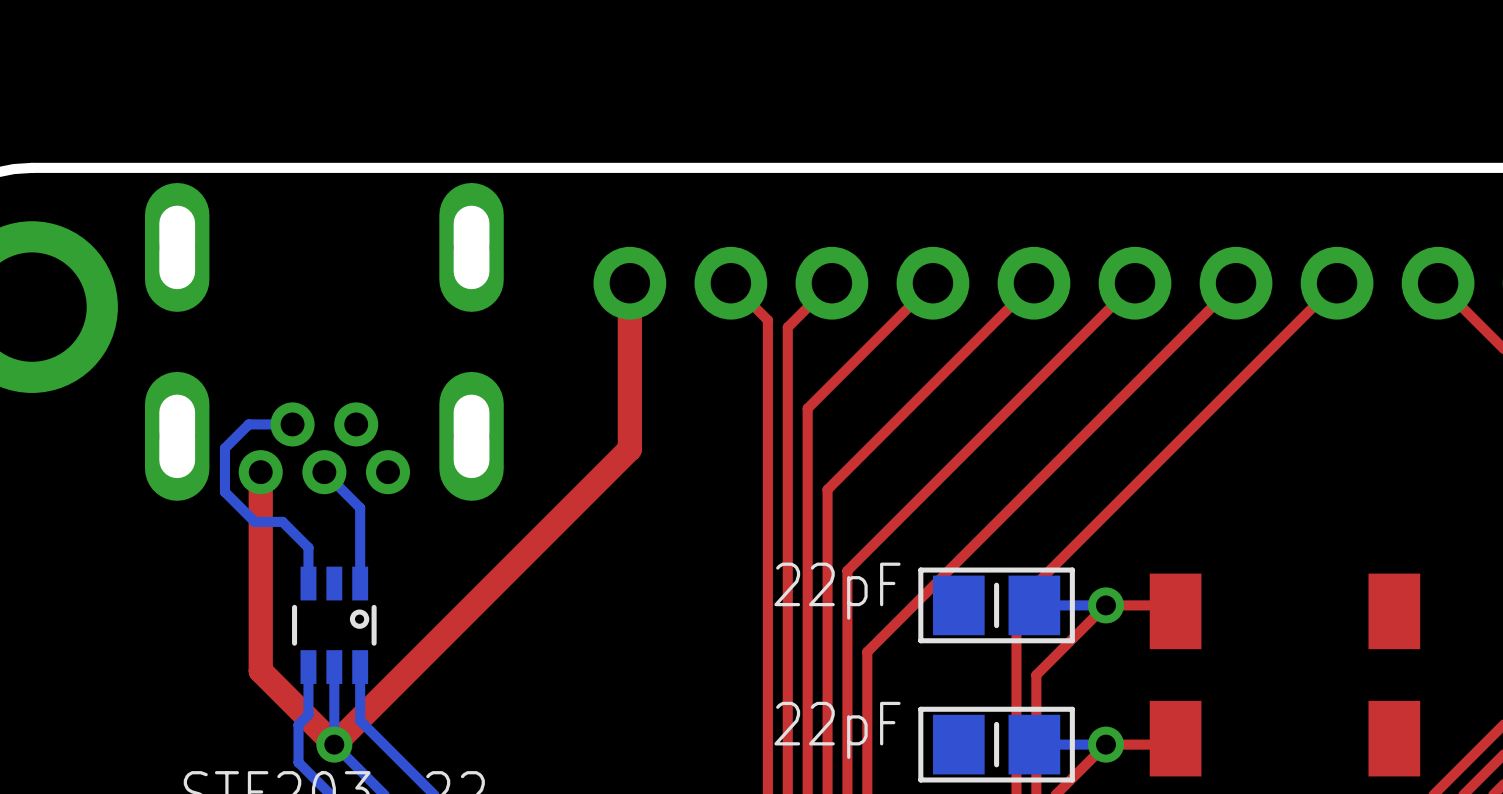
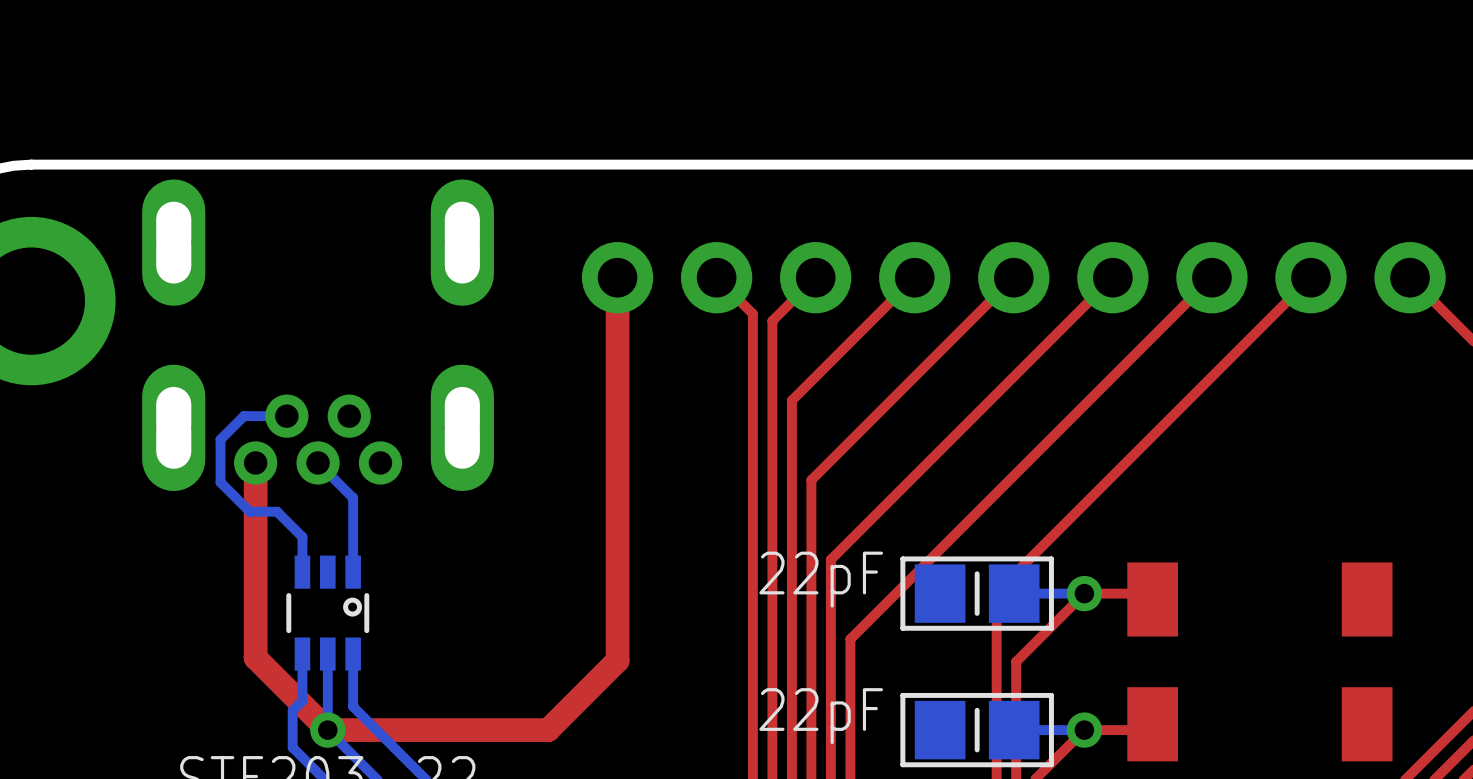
top track: (629, 449) (334, 744) -> (617, 440) (617, 660) (548, 730) (327, 730)

